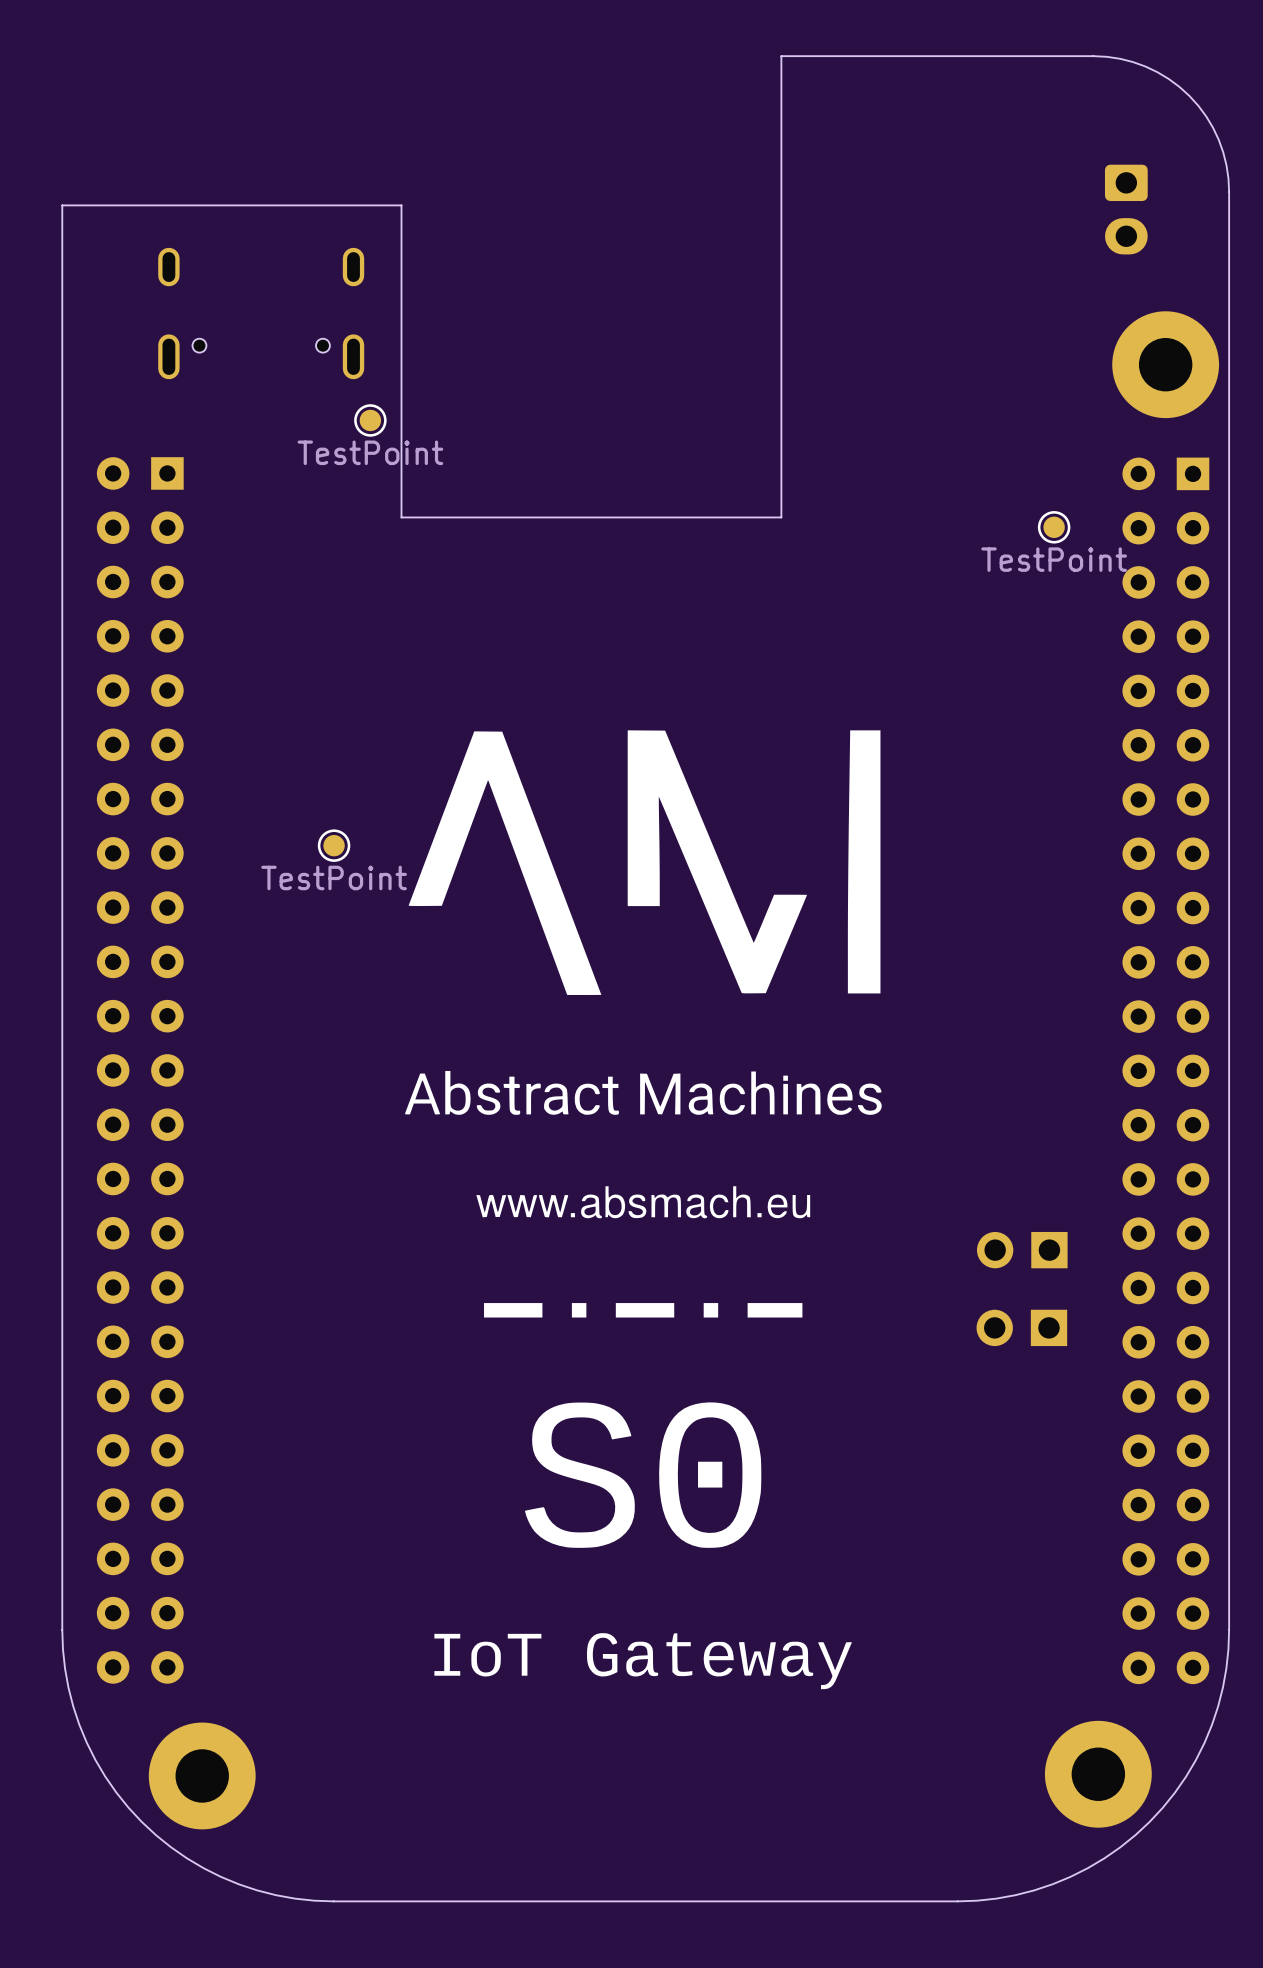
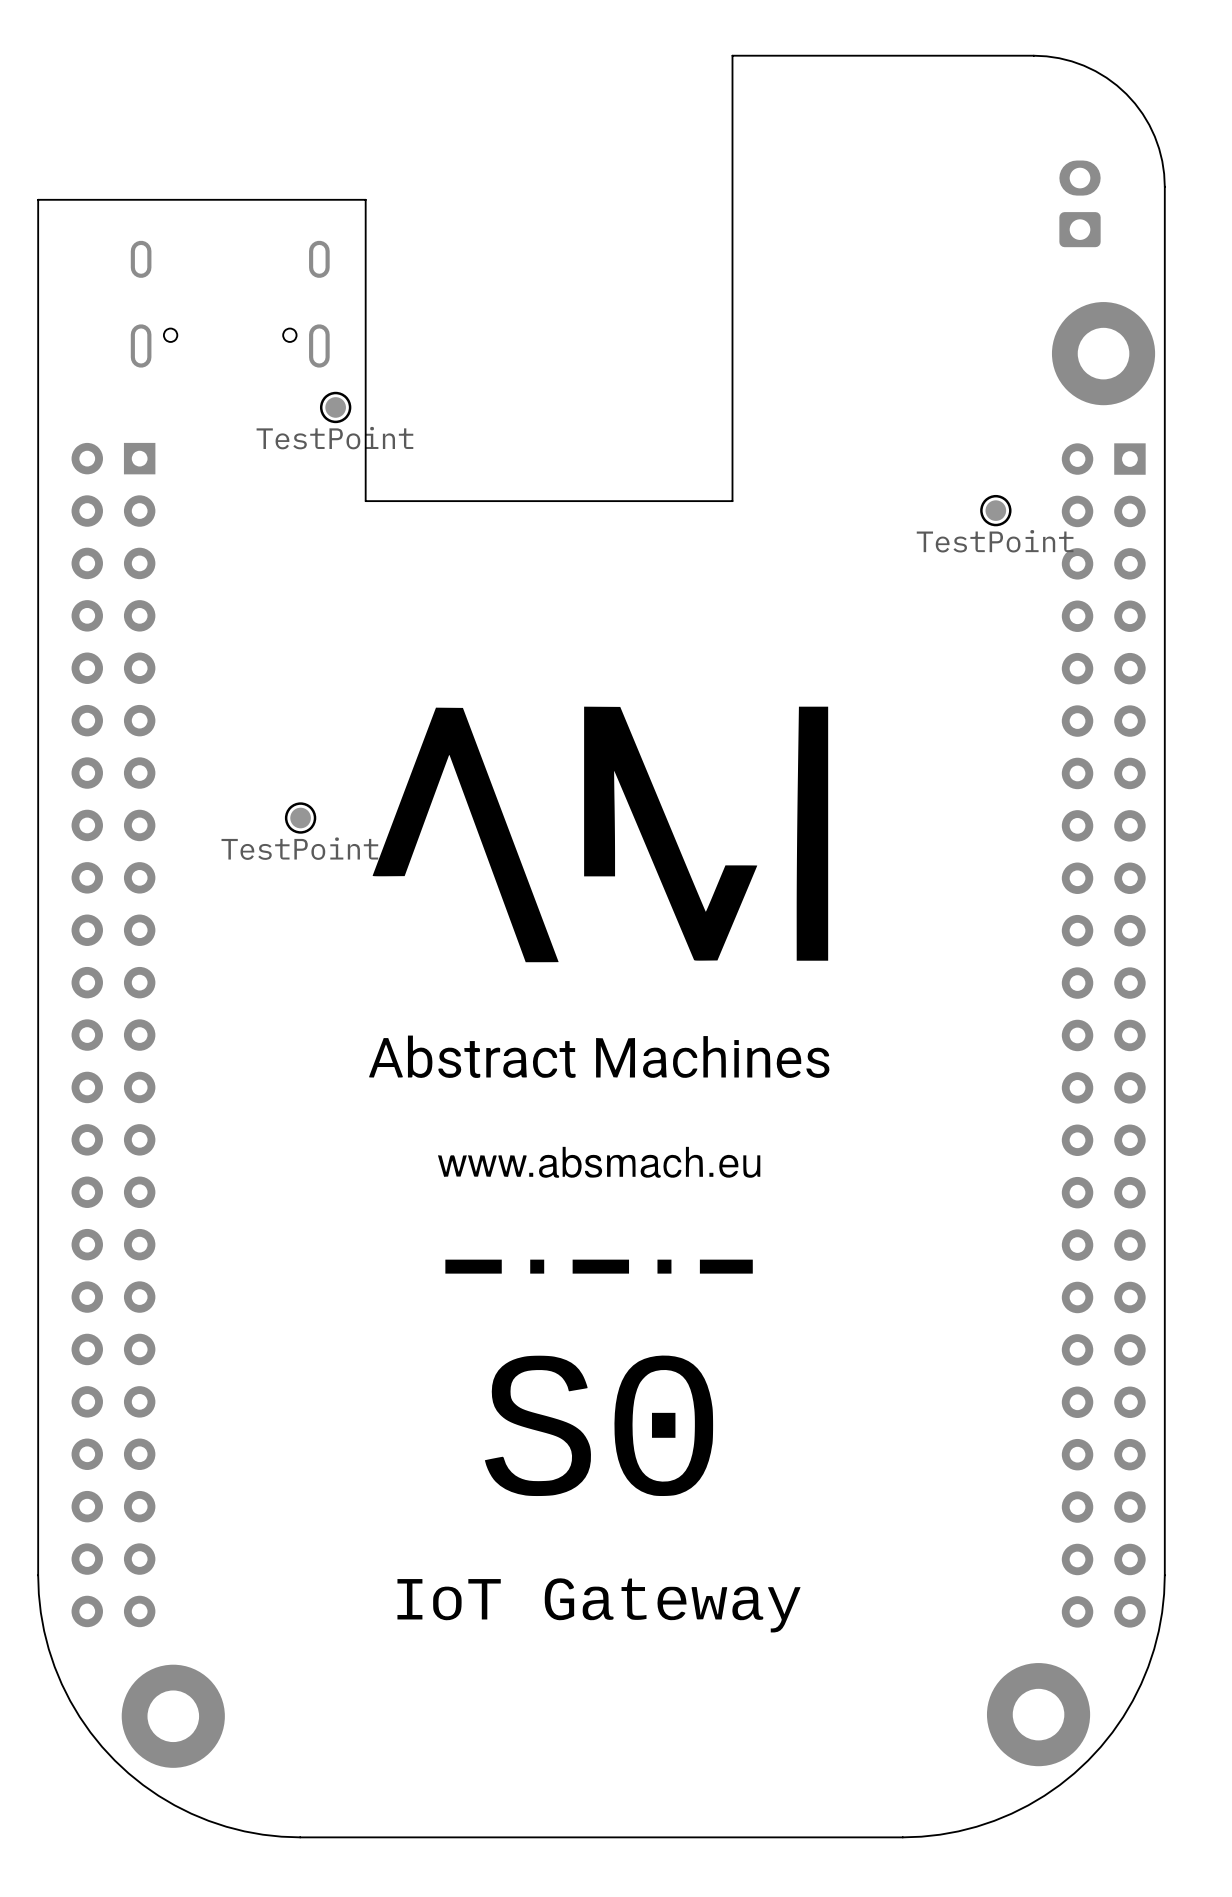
part rotation: 0° (1126, 209) -> 180° (1080, 203)
part: (1022, 1250) -> none
part: (1021, 1327) -> none

